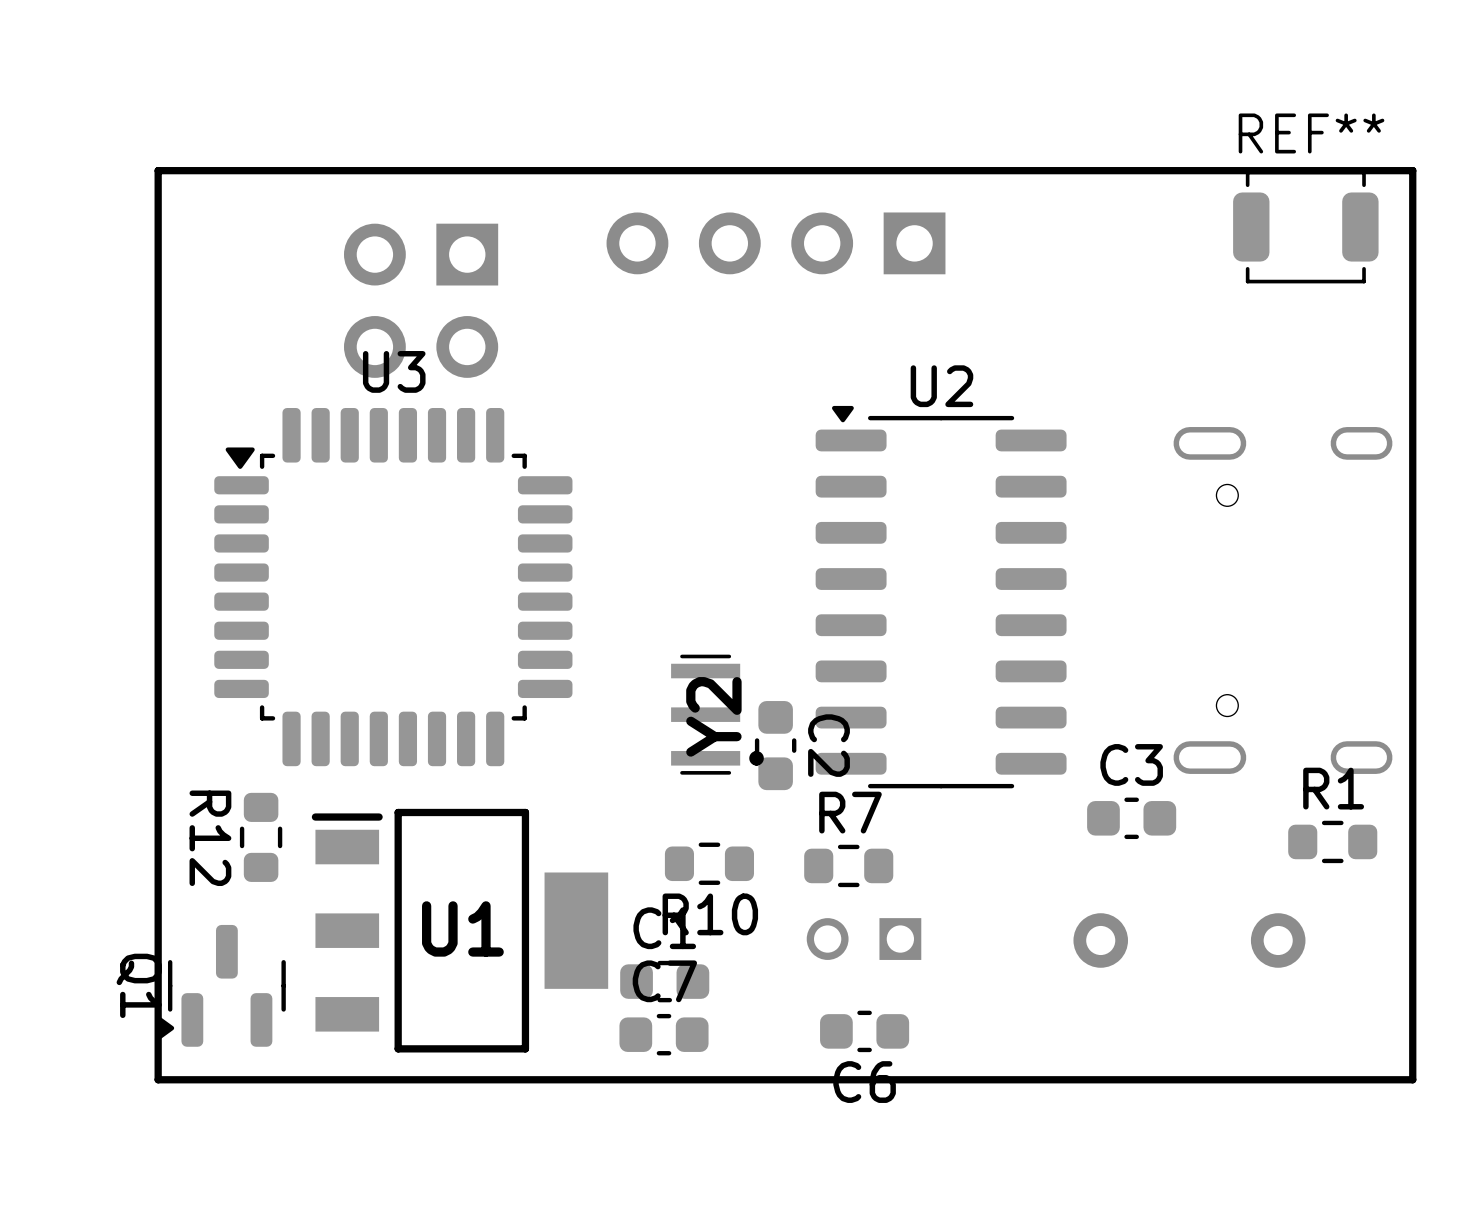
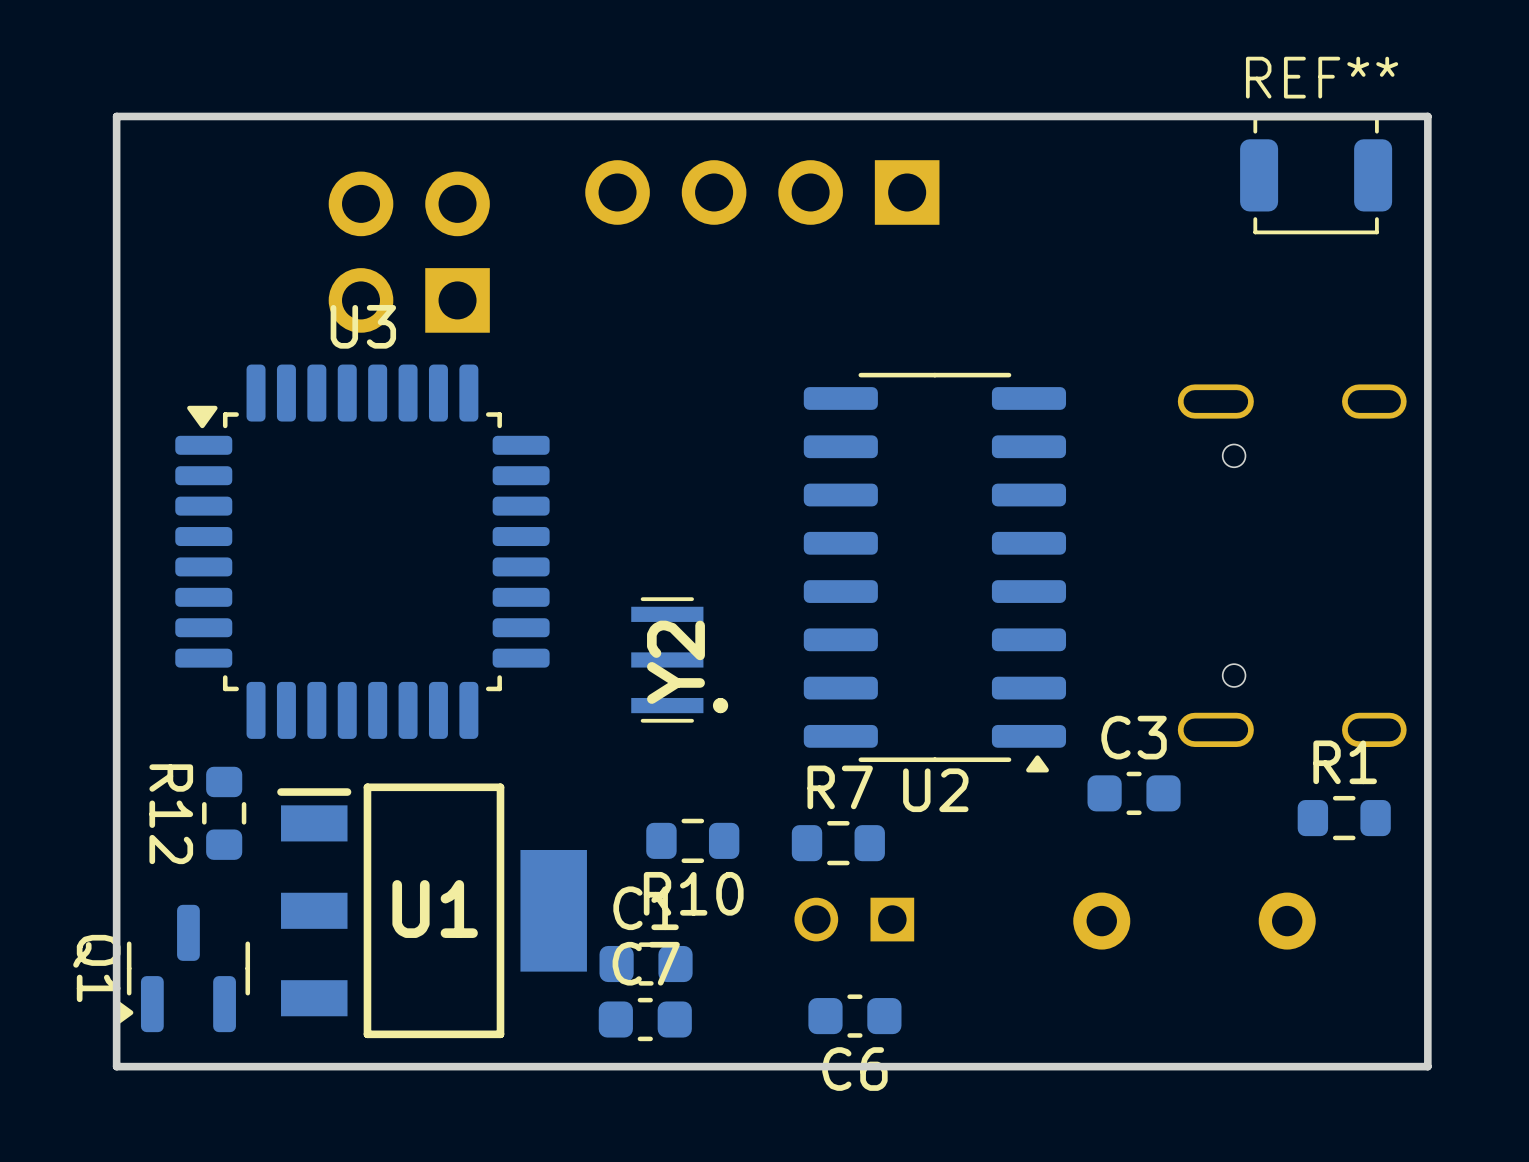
part rotation: 0° (421, 300) -> 90° clockwise (409, 252)
U2 rotation: 0° (941, 597) -> 180° (934, 572)
Y2 position: (717, 714) -> (679, 659)
C2: (775, 745) -> none

